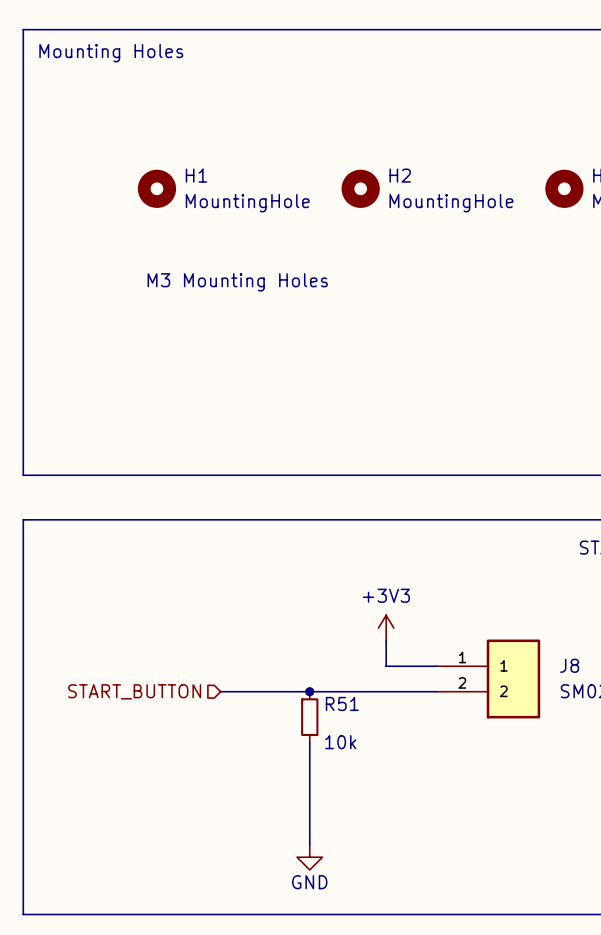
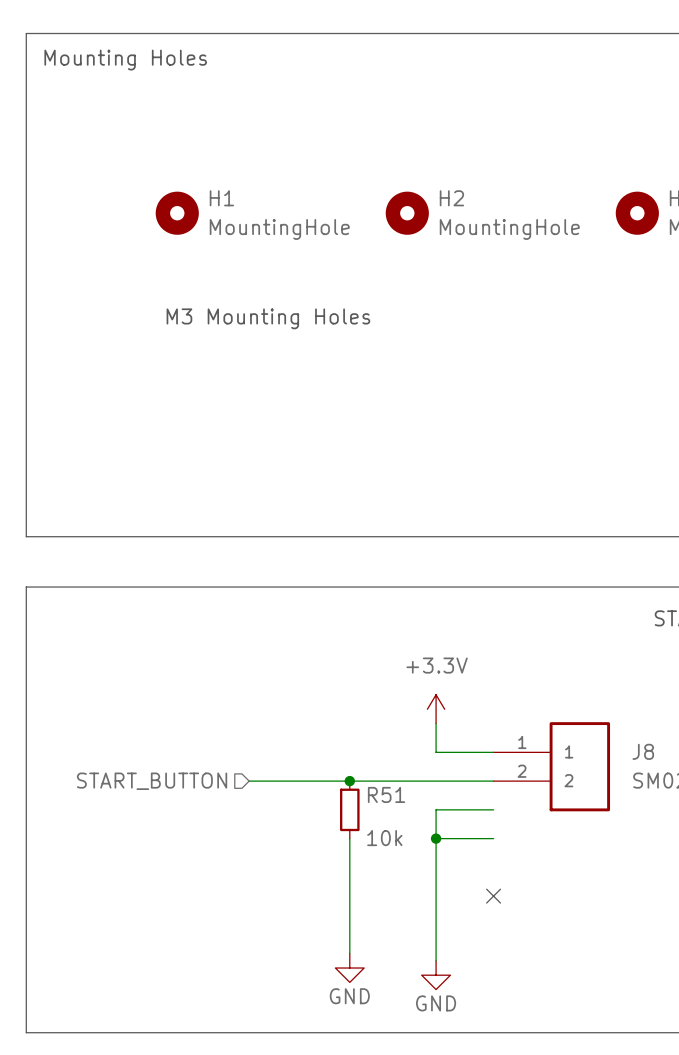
power symbol: +3V3 (386, 628) -> +3.3V (436, 709)
wire: none -> (493, 809) (436, 809) (436, 960)
wire: none -> (436, 838) (493, 838)
junction: none -> (436, 838)
no-connect mark: none -> (493, 896)
power symbol: none -> GND (436, 975)

